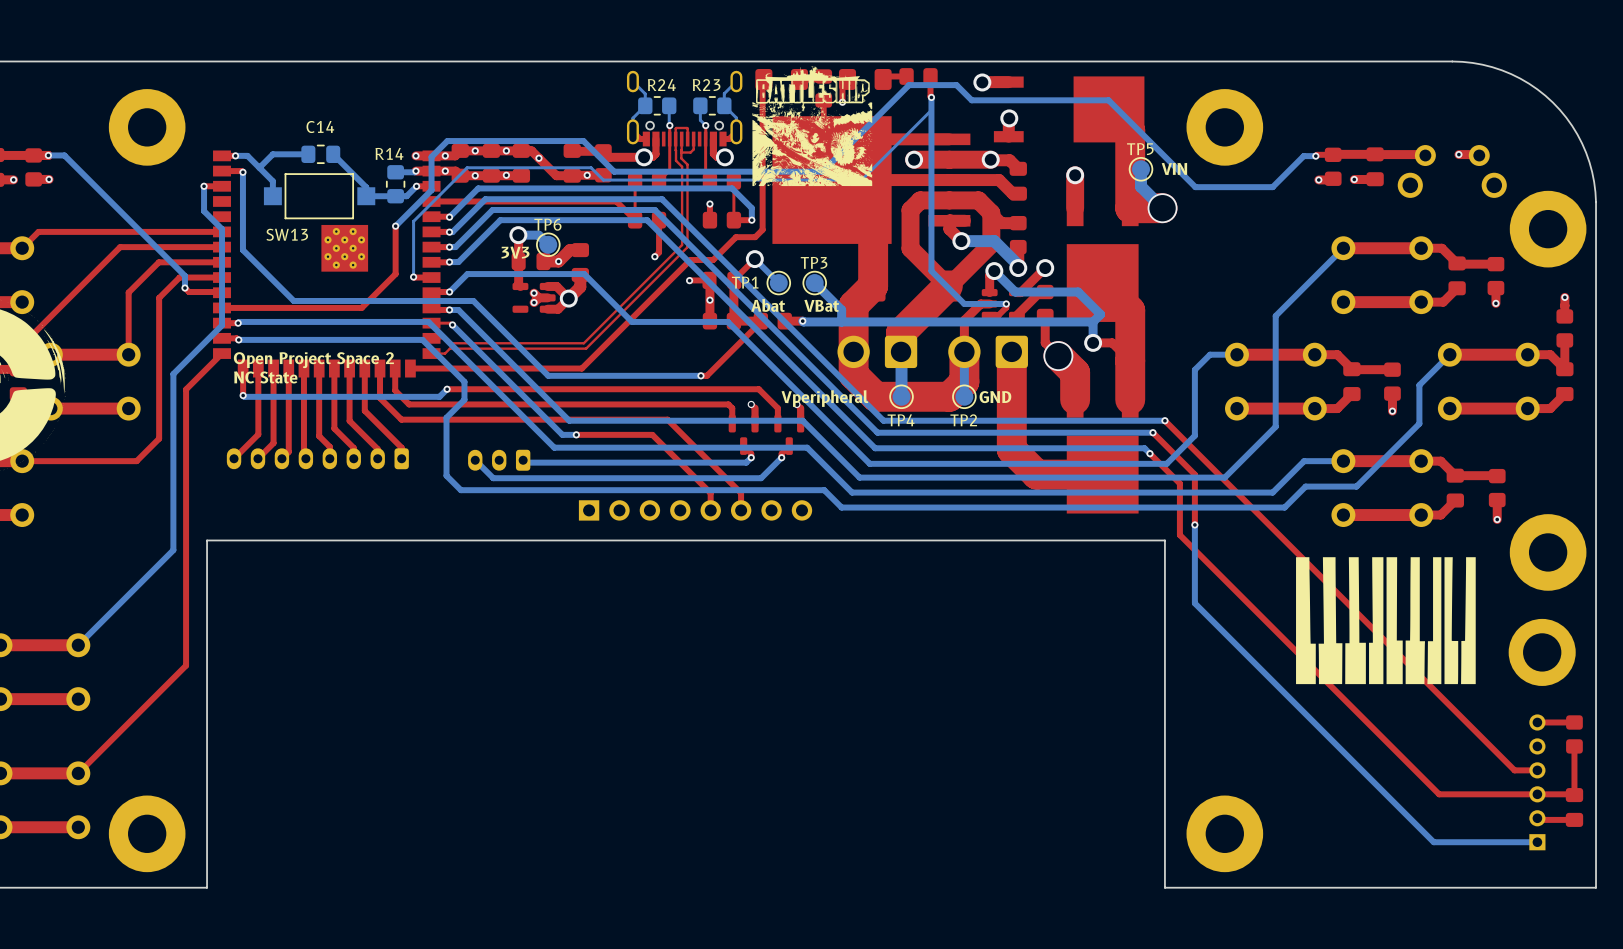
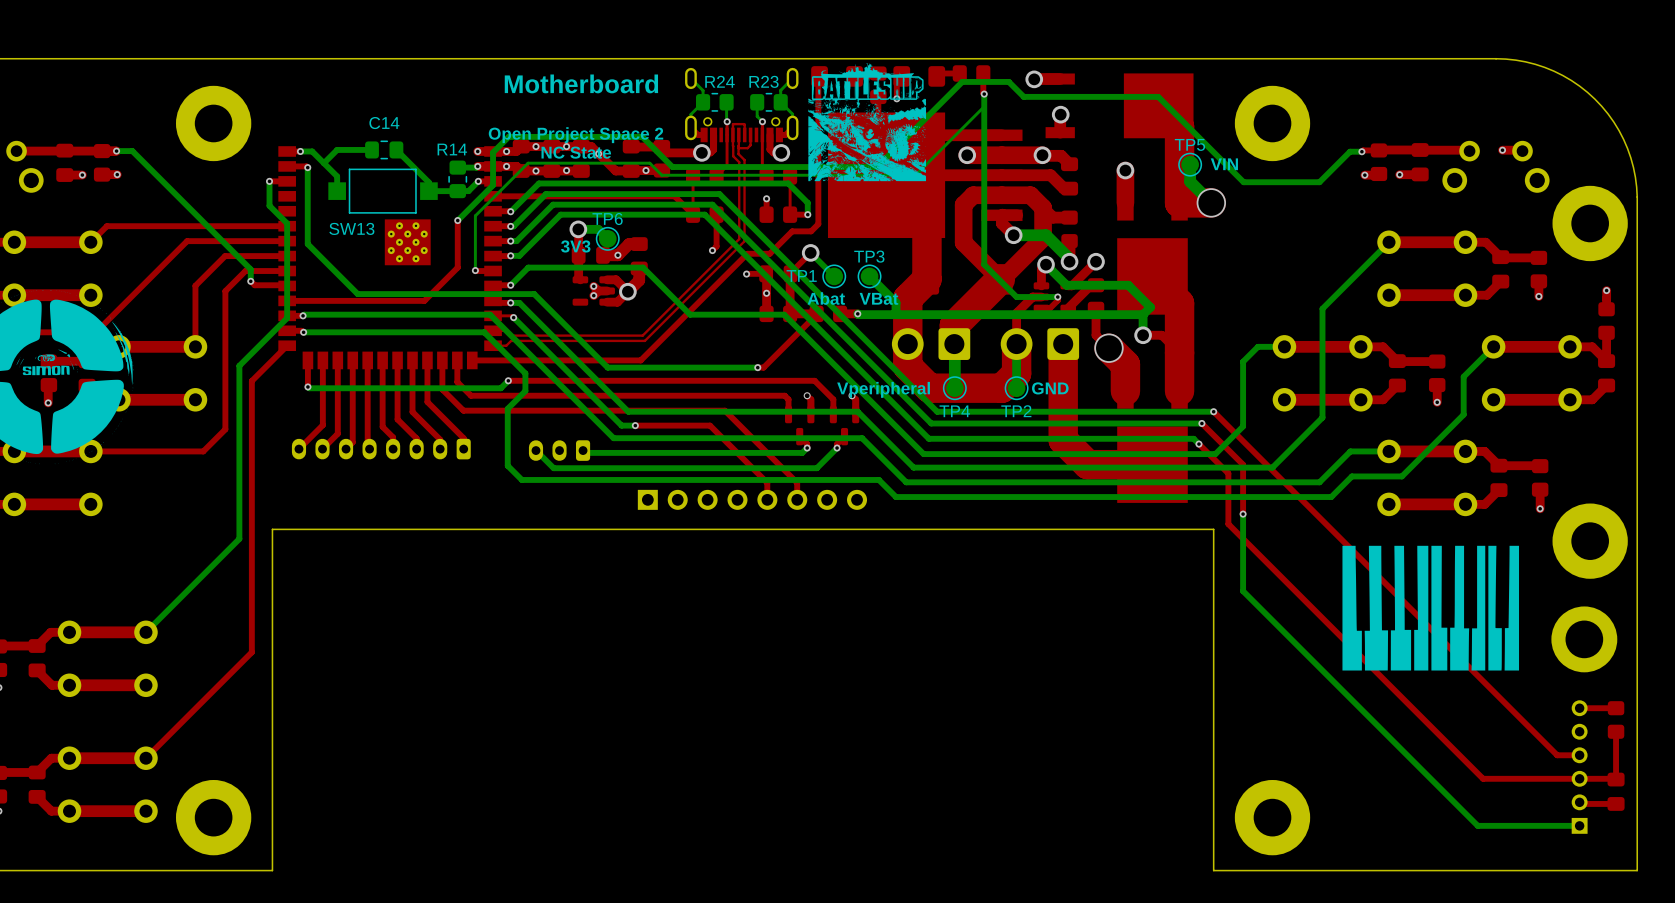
text: none -> Motherboard (581, 83)
text: none -> Open Project Space 2 (576, 135)
text: none -> NC State (576, 152)
text: Open Project Space 2 (313, 360) -> none
text: NC State (265, 377) -> none

